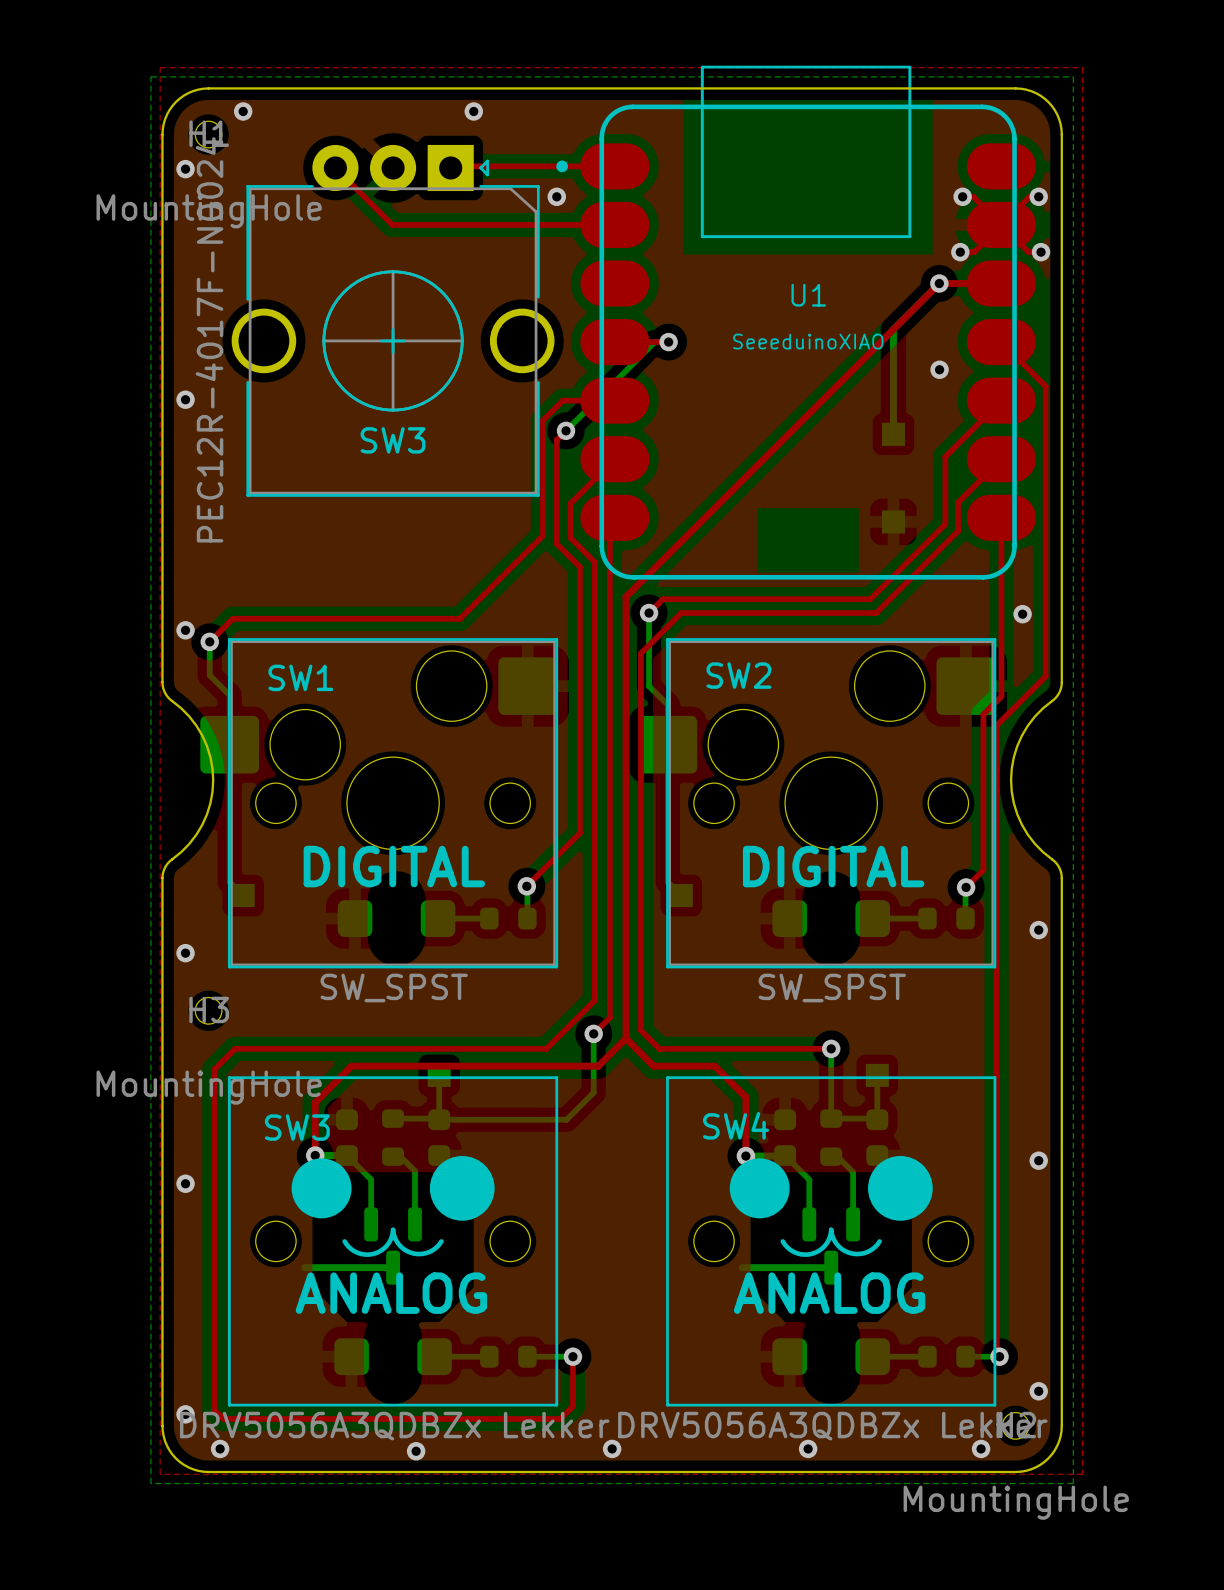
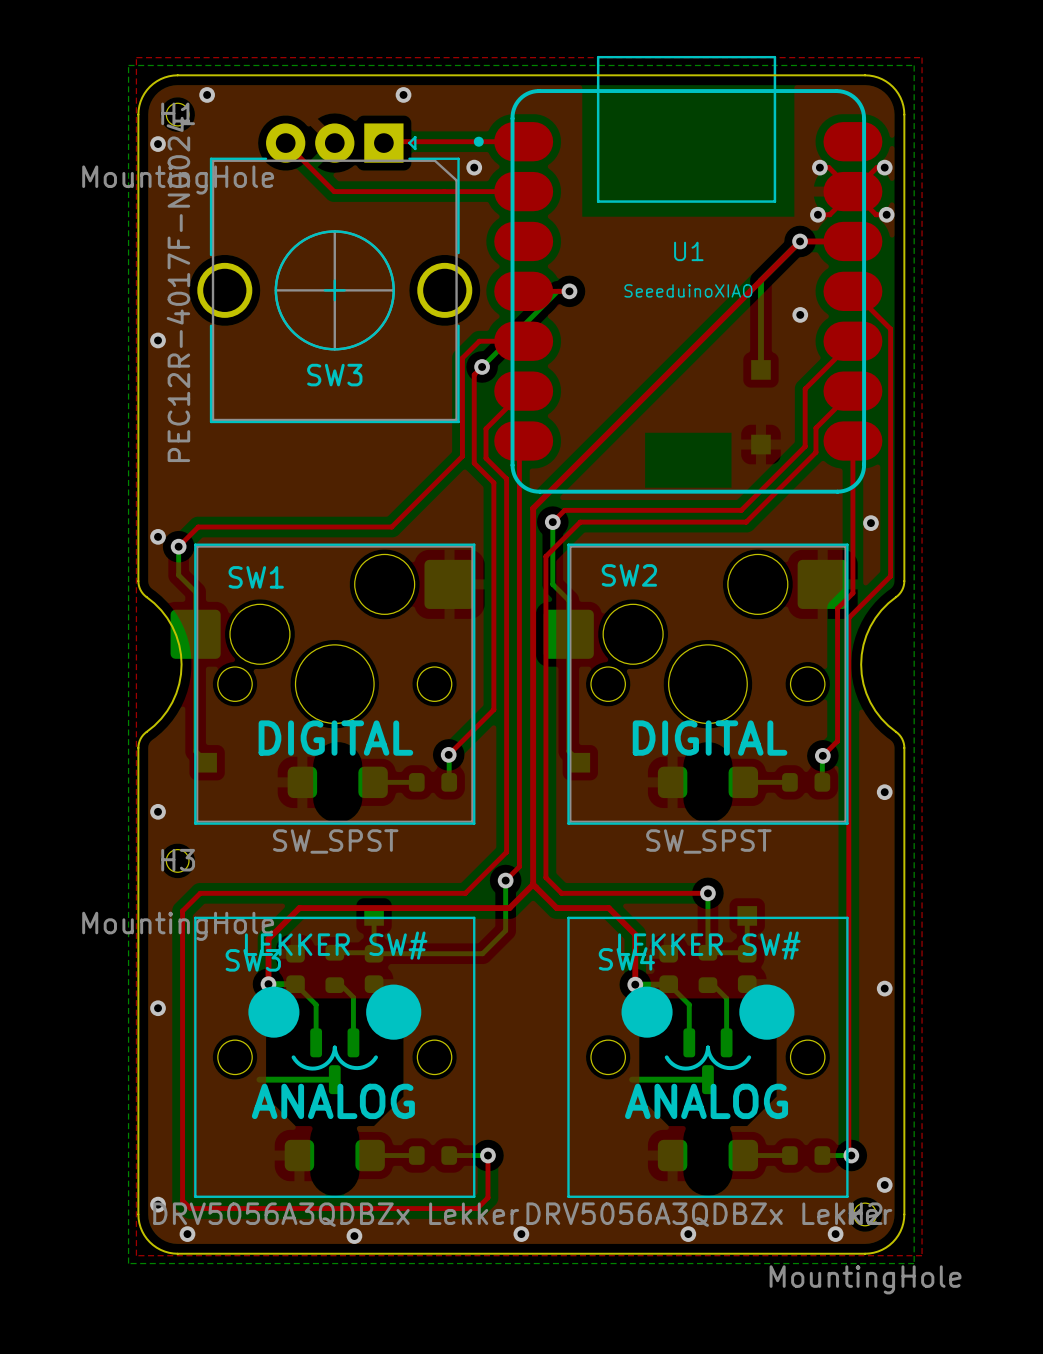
part text: none -> LEKKER SW# (336, 945)
part text: none -> LEKKER SW# (709, 945)

